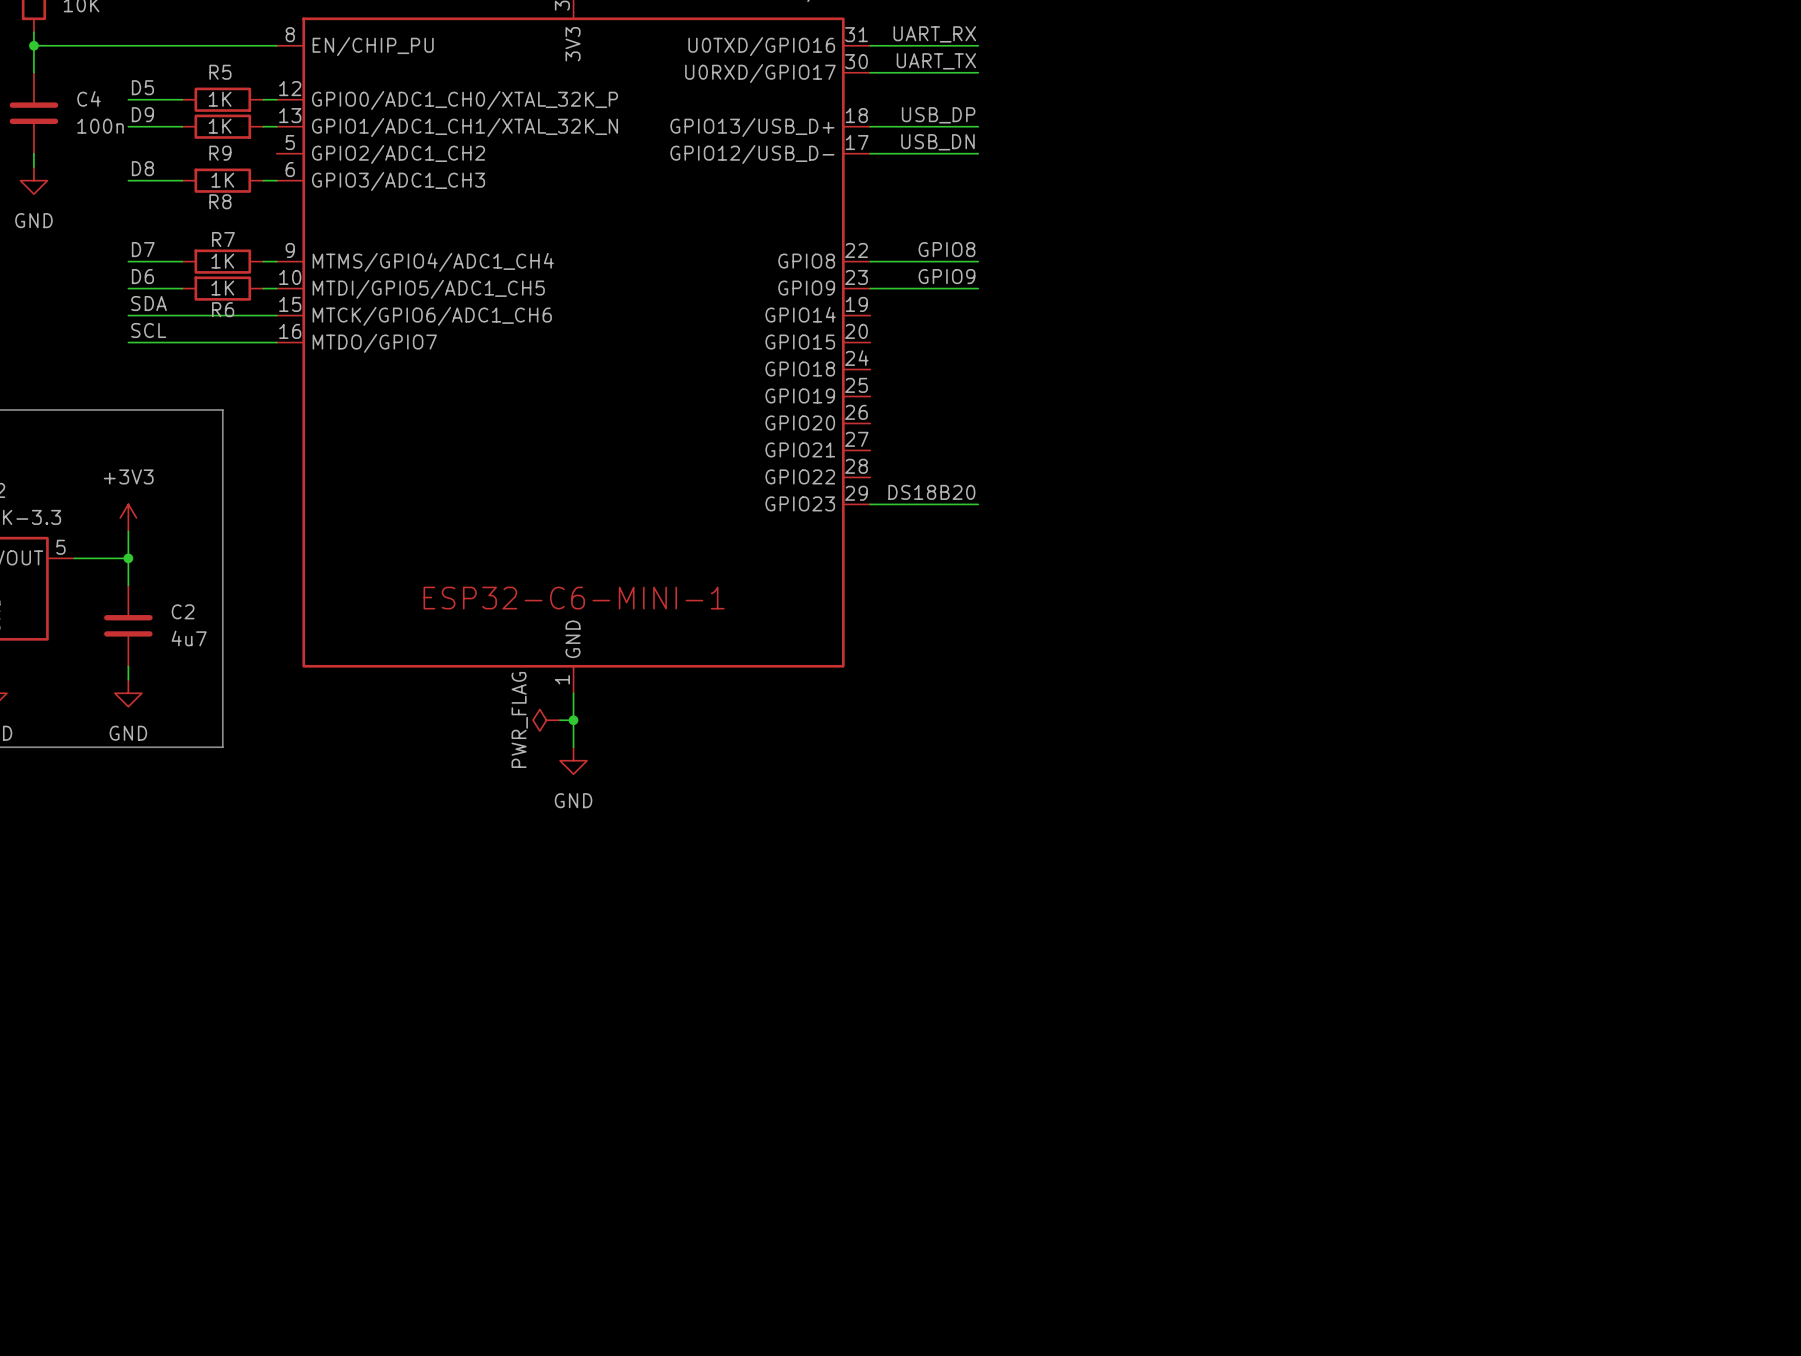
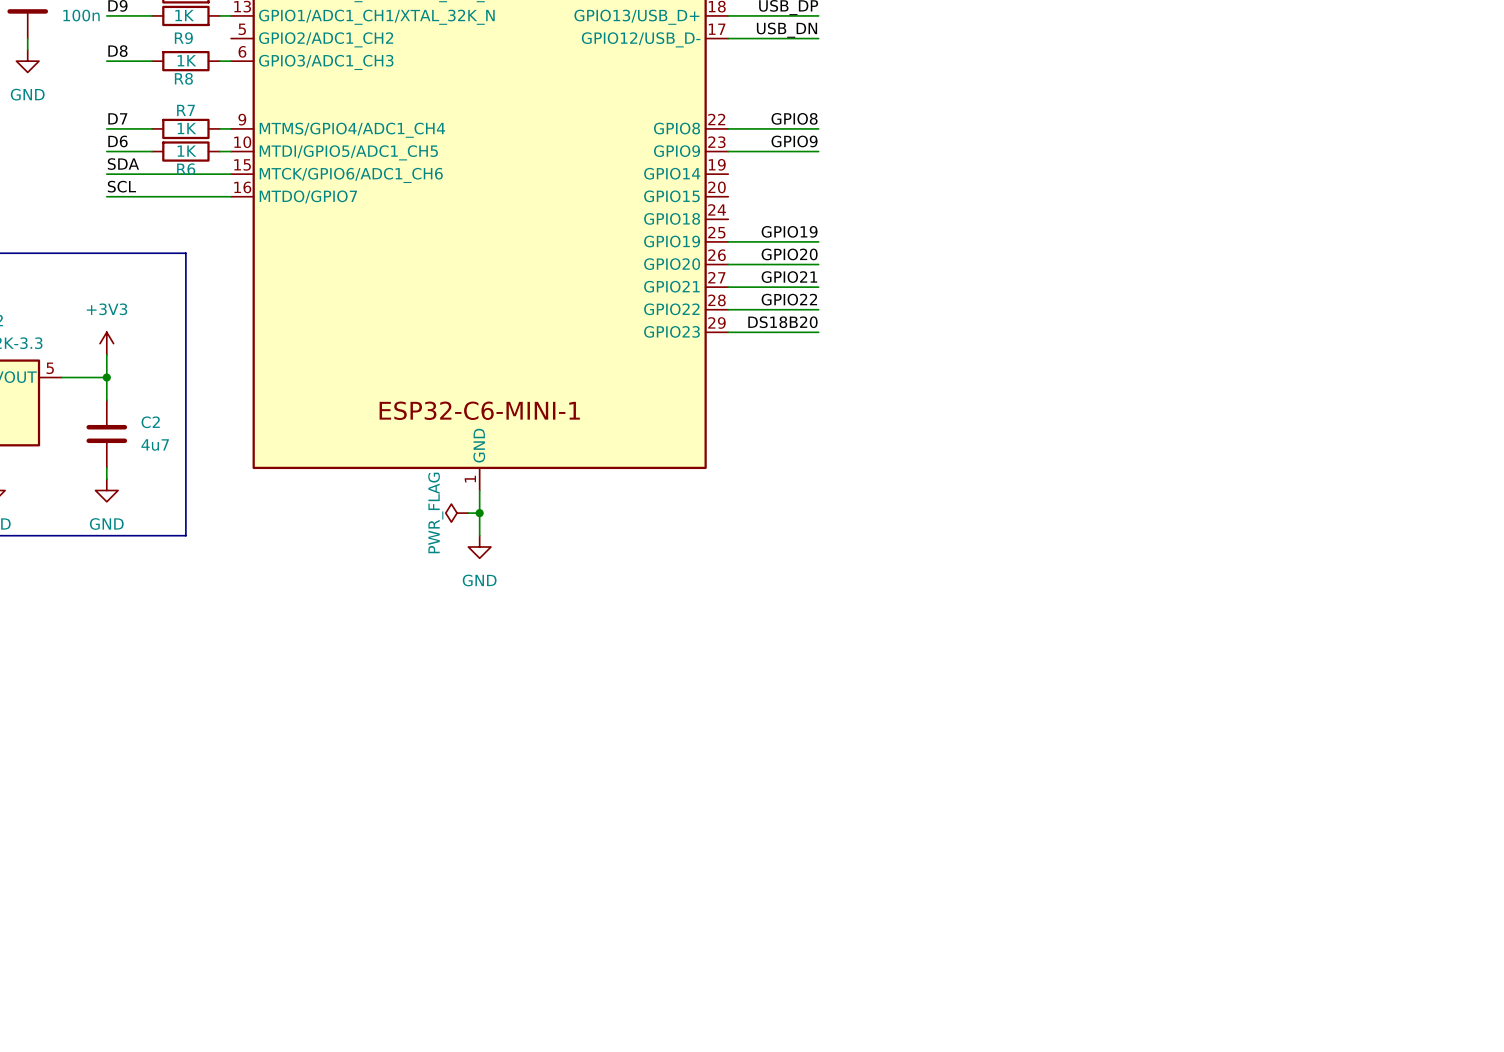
label: none -> GPIO19 (789, 231)
wire: none -> (728, 241) (818, 241)
label: none -> GPIO20 (789, 254)
wire: none -> (728, 264) (818, 264)
label: none -> GPIO21 (789, 277)
wire: none -> (728, 287) (818, 287)
label: none -> GPIO22 (789, 299)
wire: none -> (728, 309) (818, 309)

